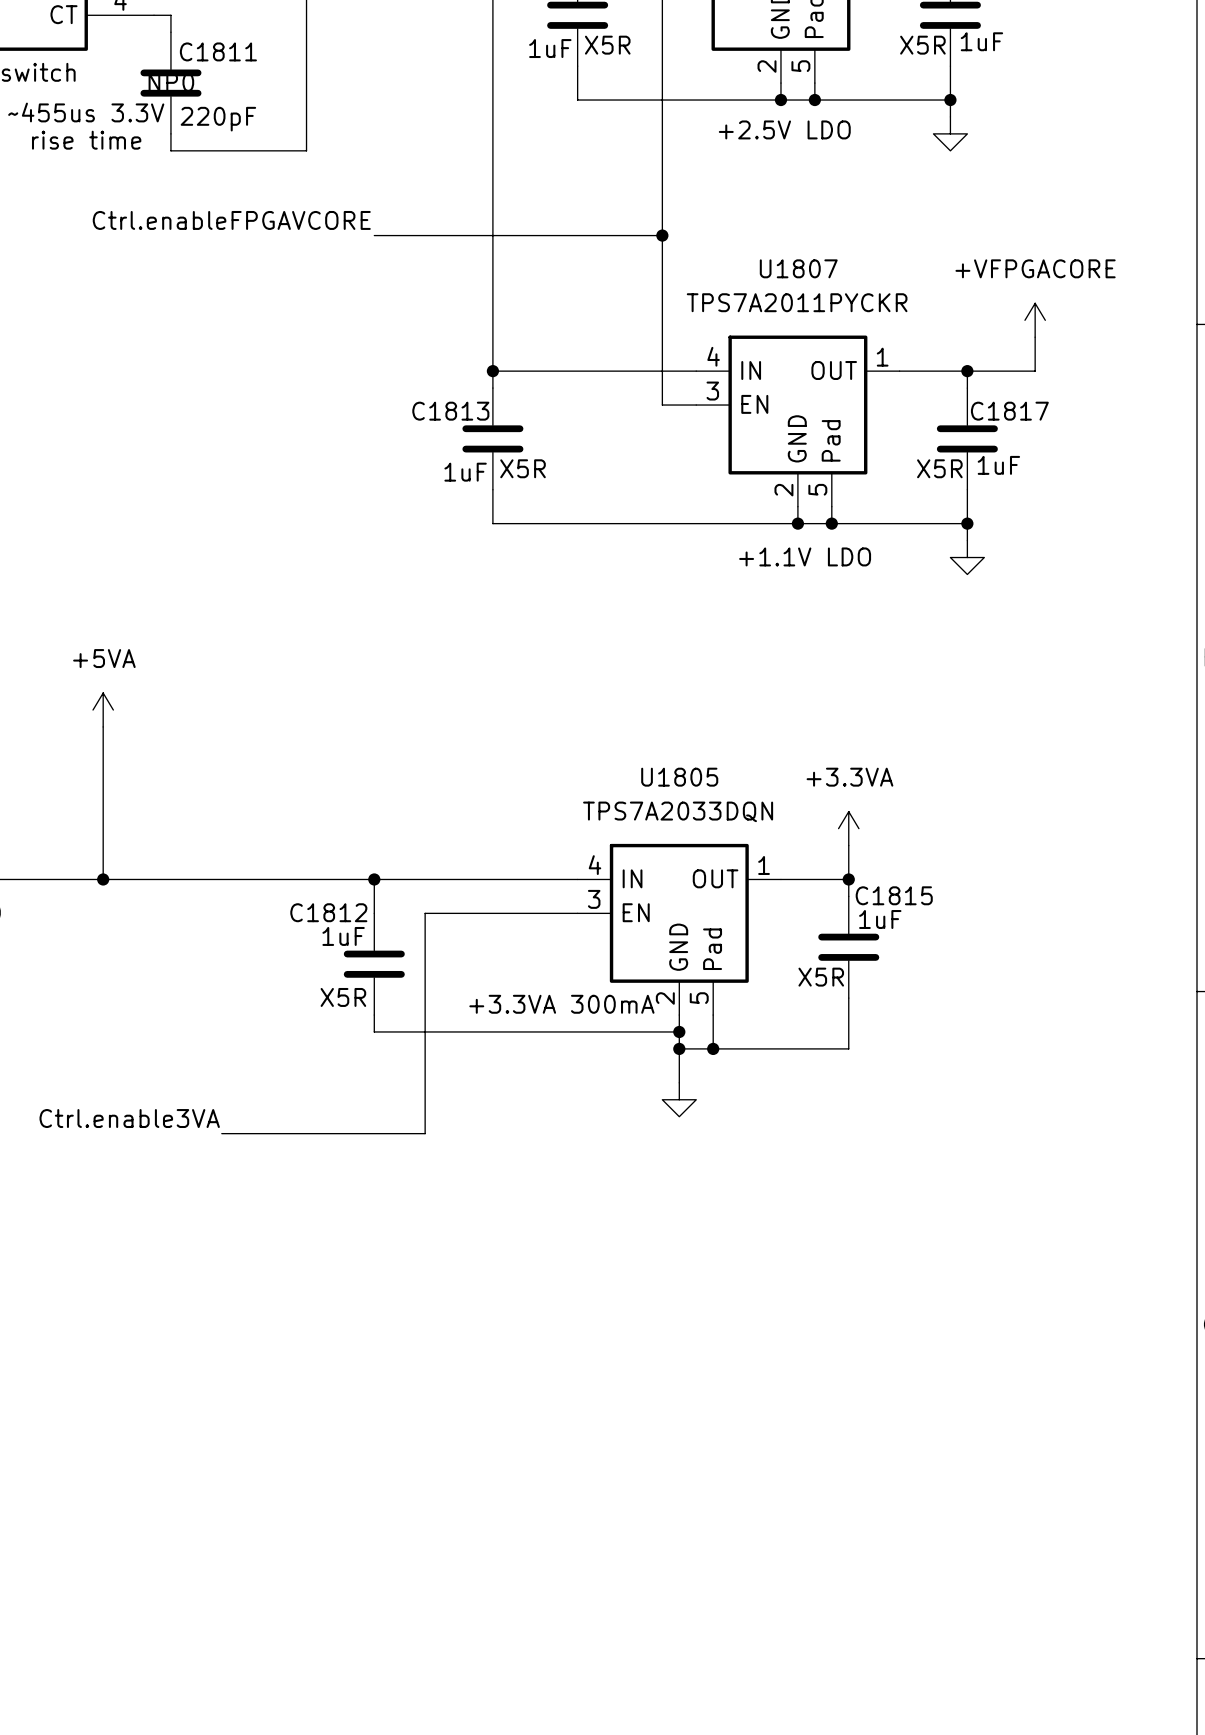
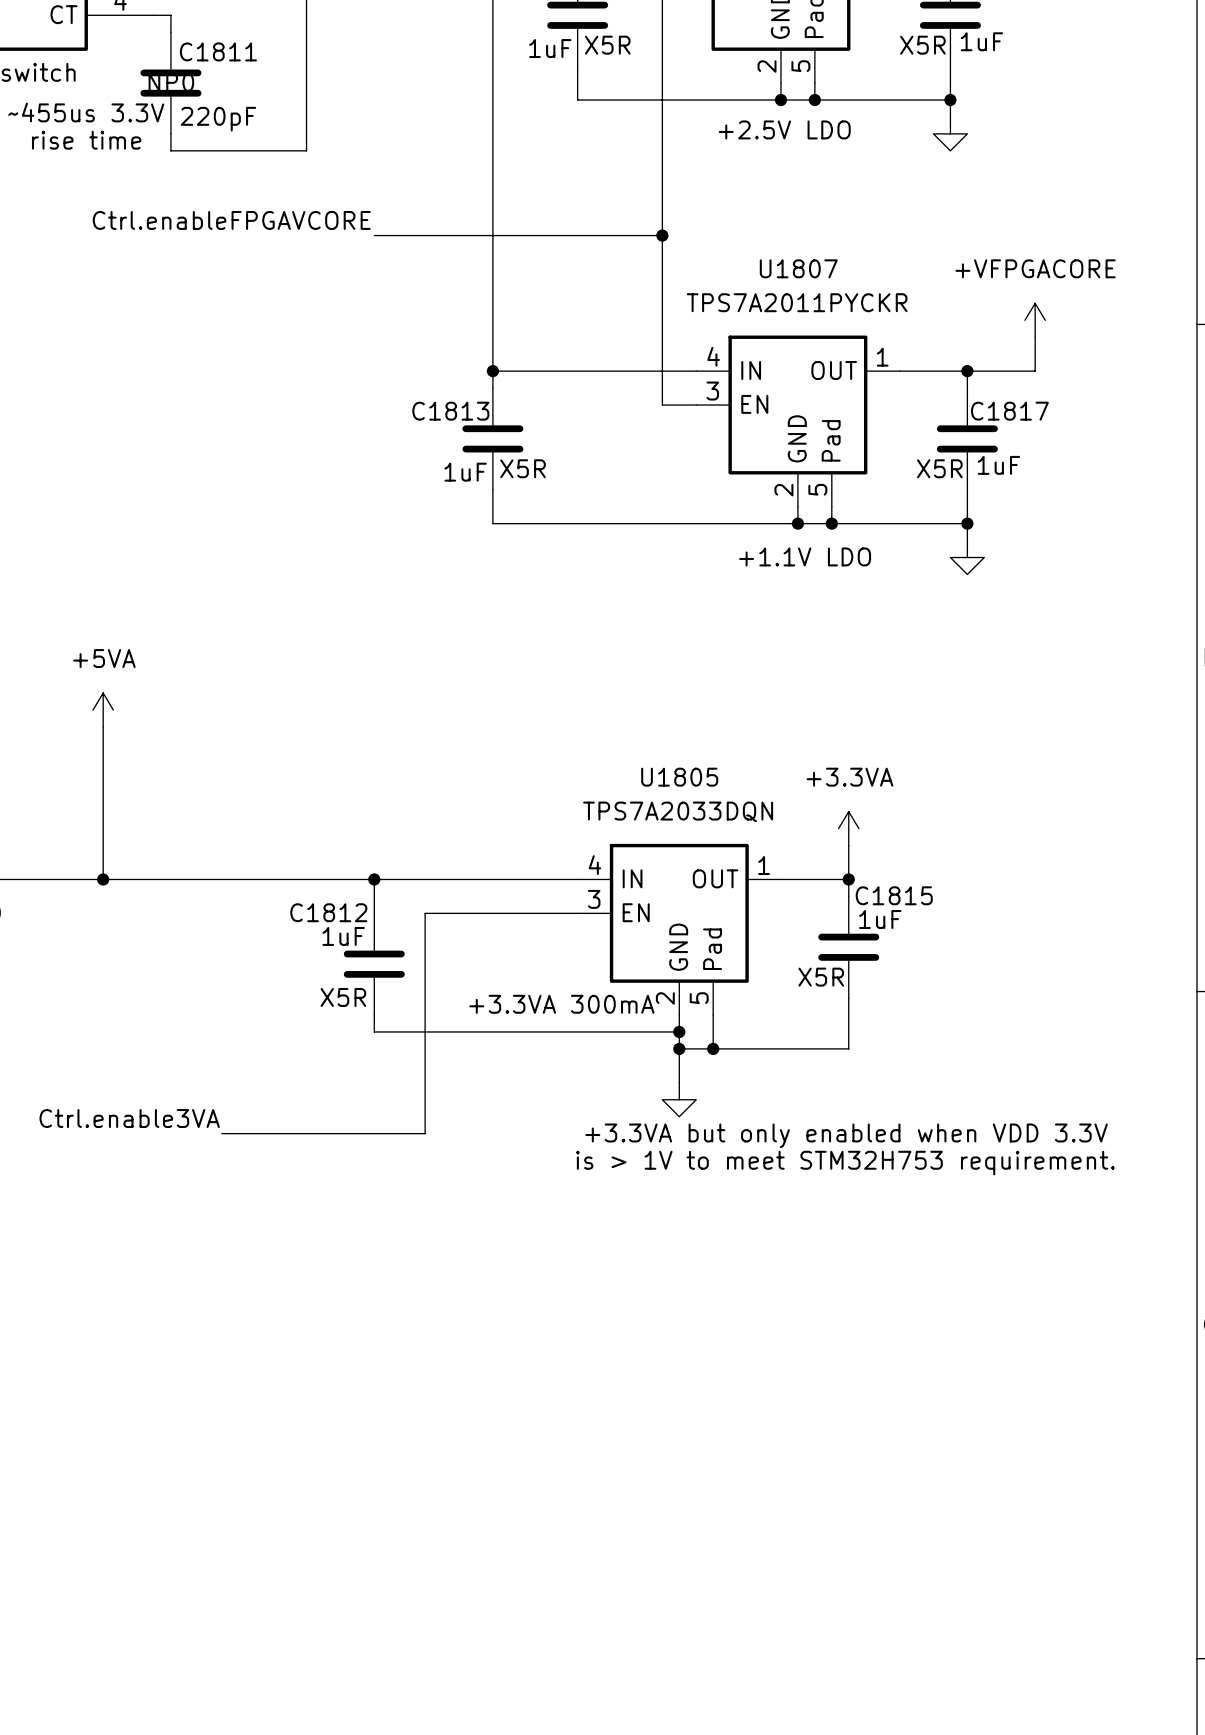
text: none -> +3.3VA but only enabled when VDD 3.3V (846, 1135)
text: none -> is > 1V to meet STM32H753 requirement. (845, 1163)

